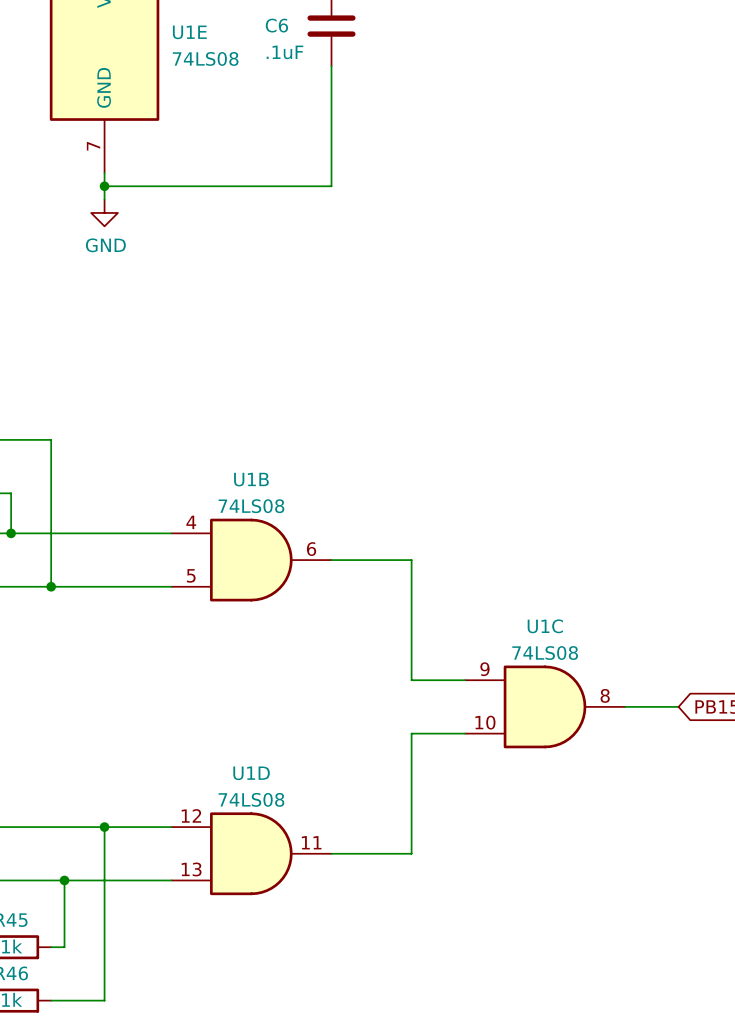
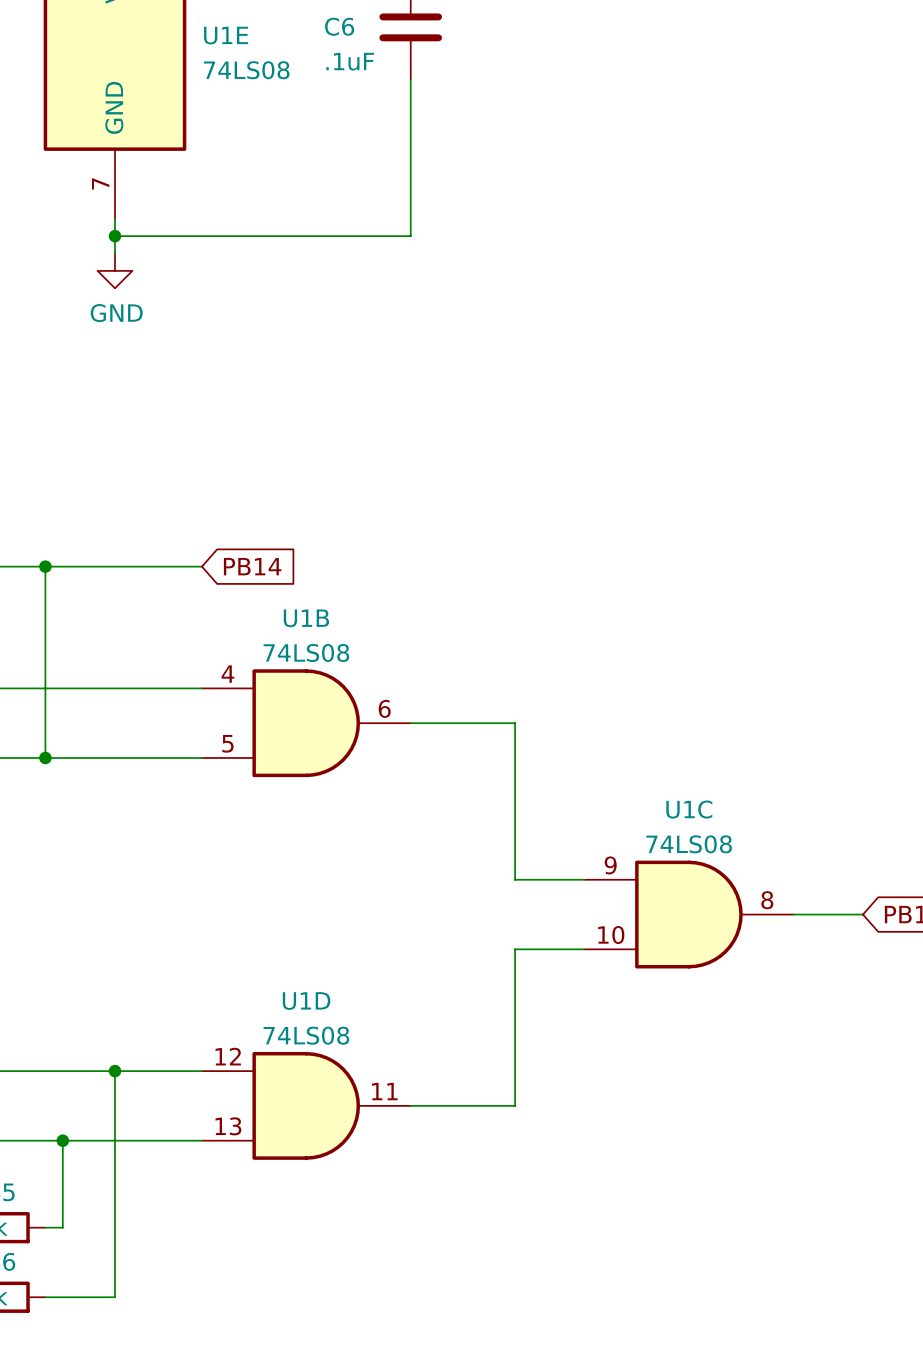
wire: none -> (45, 566) (201, 566)
junction: none -> (45, 566)
global label: none -> PB14 (252, 566)

